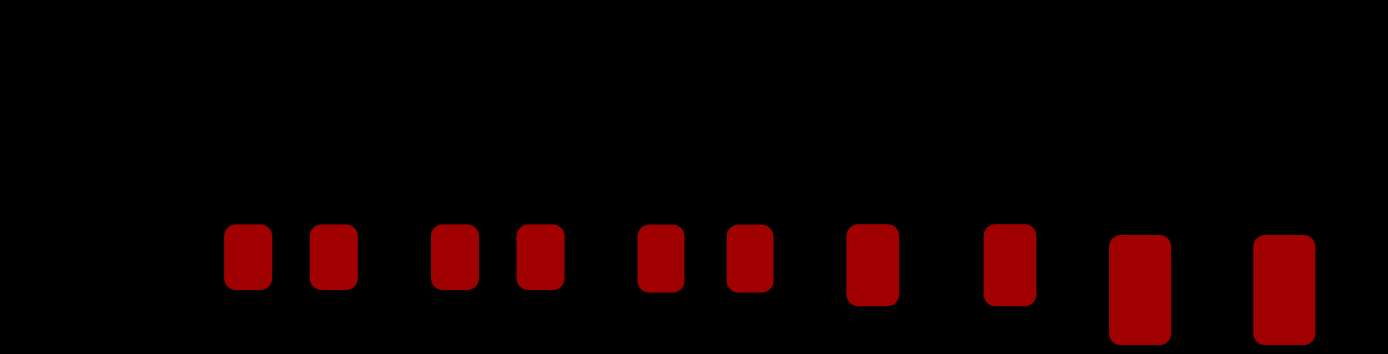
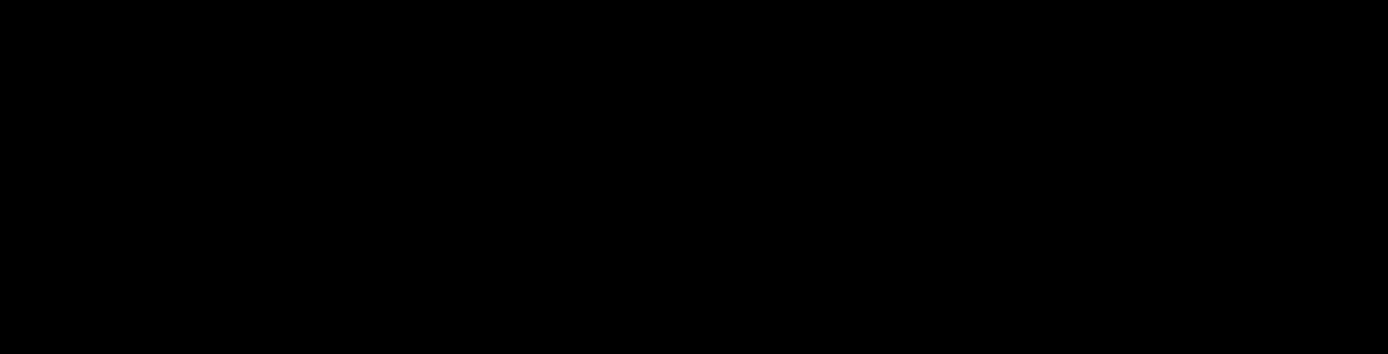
part: (290, 257) -> none
part: (497, 257) -> none
part: (705, 258) -> none
part: (941, 265) -> none
part: (1212, 290) -> none

